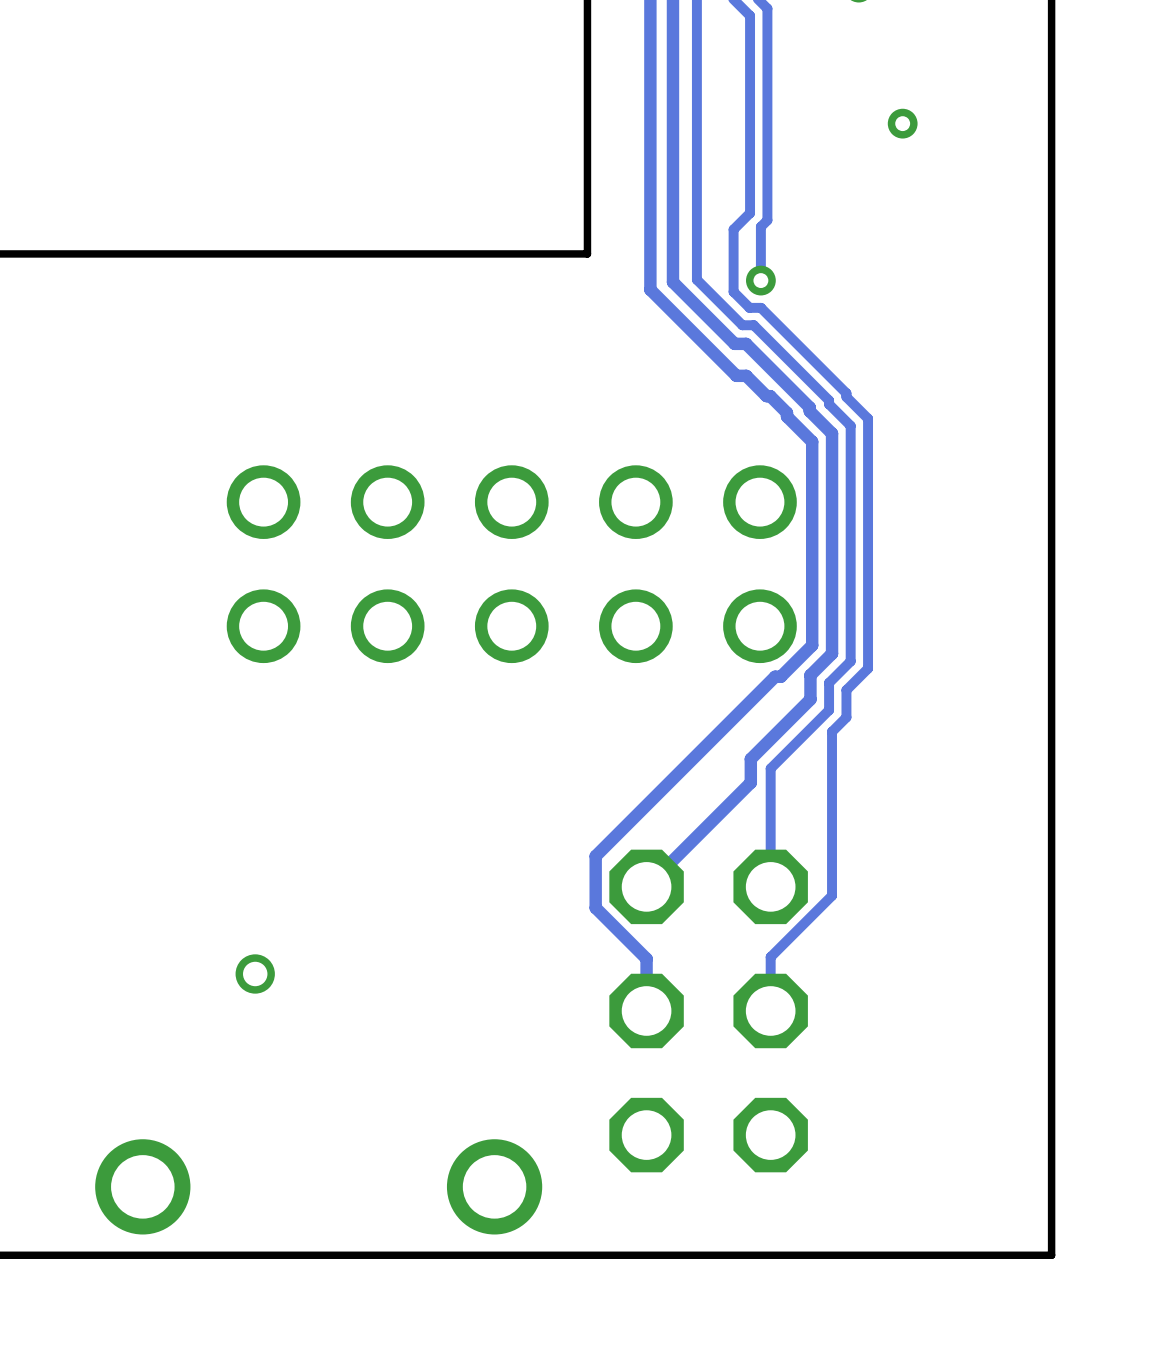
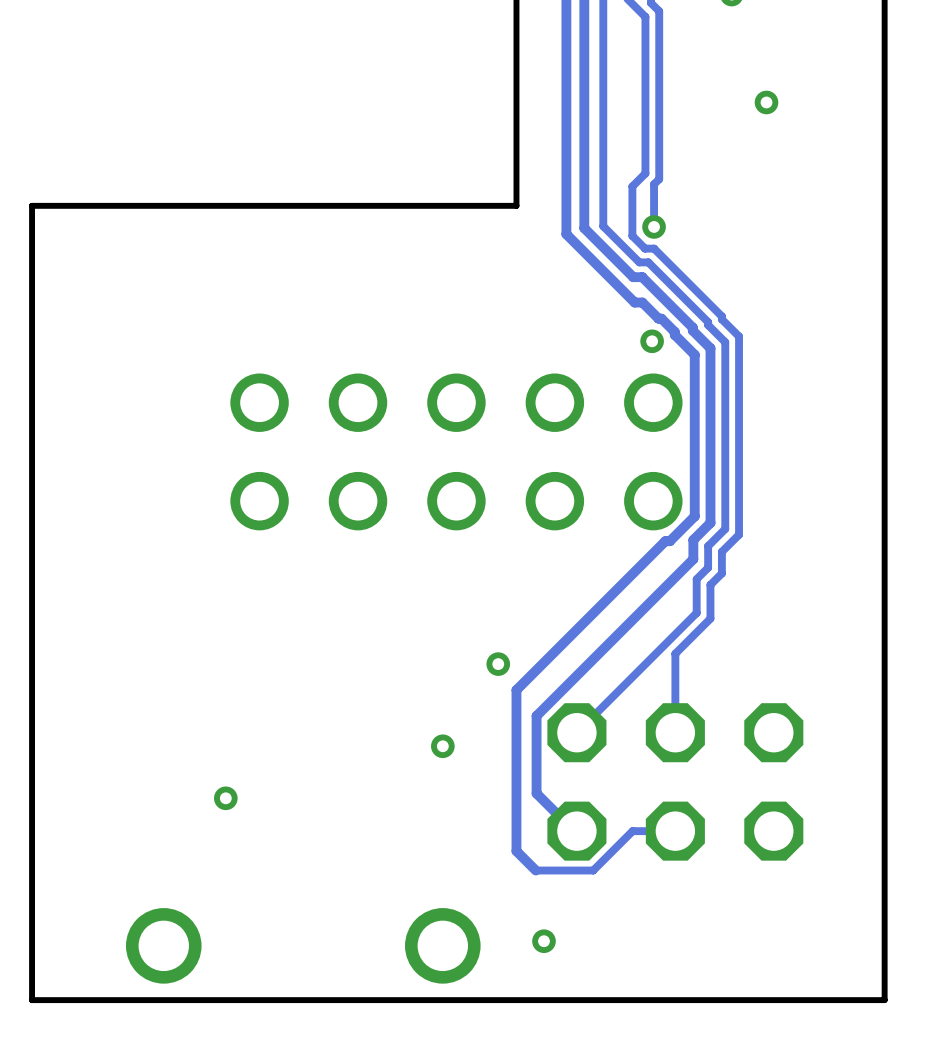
via: none -> (652, 341)
track: (814, 724) (770, 768) (770, 886) -> (696, 579) (696, 612) (576, 732)
track: (750, 759) (750, 782) (646, 886) -> (646, 606) (536, 715) (536, 793) (575, 832) (576, 831)
track: (832, 774) (832, 895) (770, 957) (770, 1010) -> (710, 618) (675, 653) (675, 732)
via: none -> (498, 664)
track: (595, 856) (595, 907) (646, 958) (646, 1010) -> (523, 683) (516, 690) (516, 851) (535, 870) (593, 870) (632, 831) (675, 831)
via: none -> (442, 746)
via position: (255, 973) -> (225, 798)
part rotation: 0° (708, 1010) -> 90° clockwise (675, 781)
via: none -> (543, 941)

